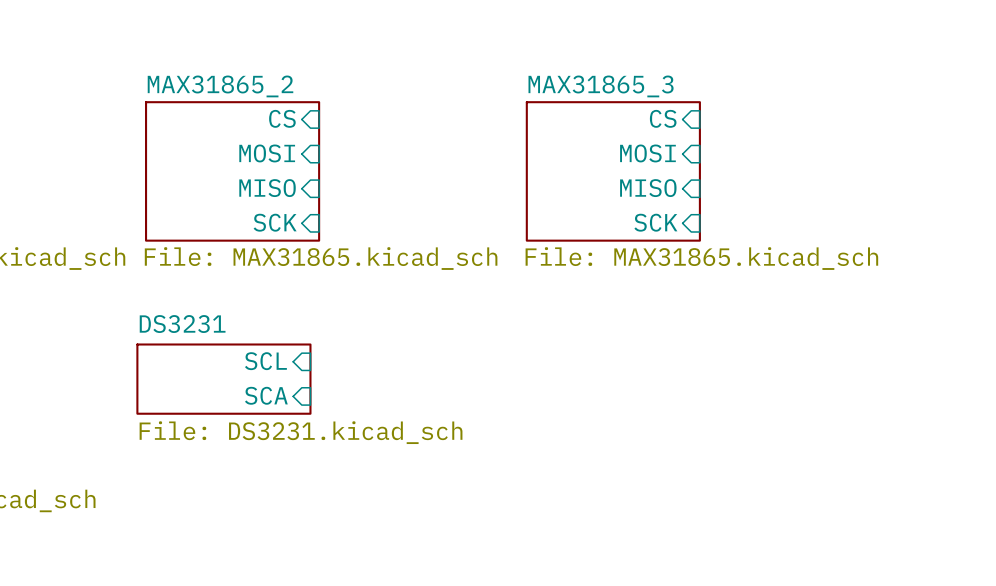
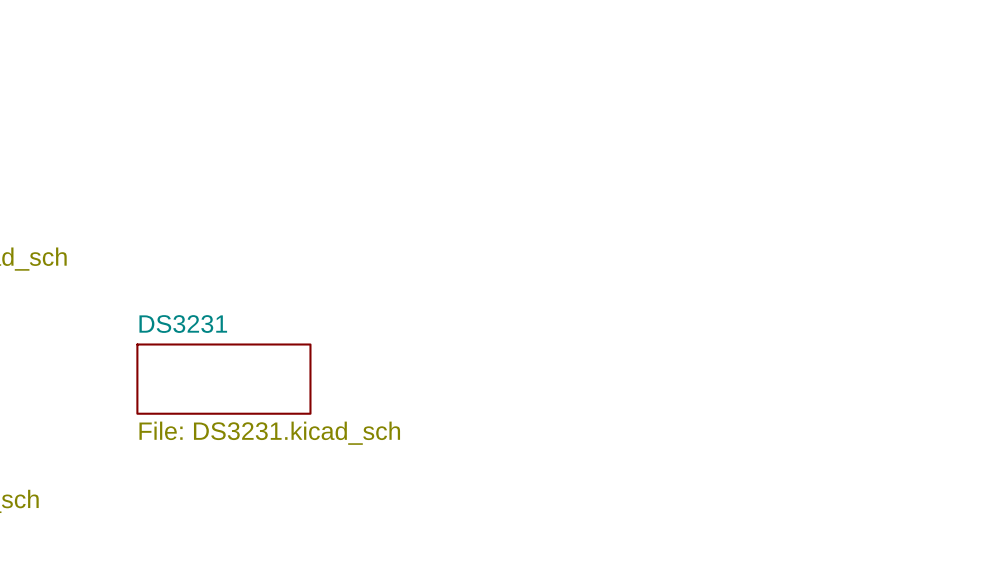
sheet pin: CS (282, 118) -> none
sheet pin: CS (663, 118) -> none
sheet pin: MOSI (267, 153) -> none
sheet pin: MOSI (647, 153) -> none
sheet MAX31865_2: File: MAX31865.kicad_sch (232, 171) -> none
sheet MAX31865_3: File: MAX31865.kicad_sch (613, 171) -> none
sheet pin: MISO (267, 188) -> none
sheet pin: MISO (648, 188) -> none
sheet pin: SCK (275, 222) -> none
sheet pin: SCK (655, 222) -> none
sheet pin: SCL (265, 361) -> none
sheet pin: SCA (266, 395) -> none

